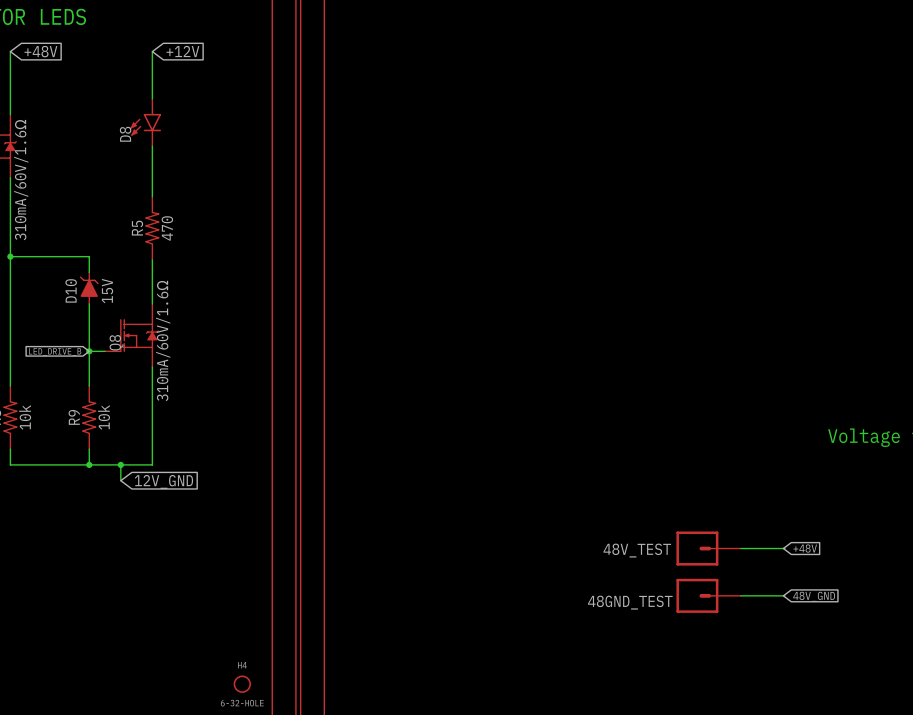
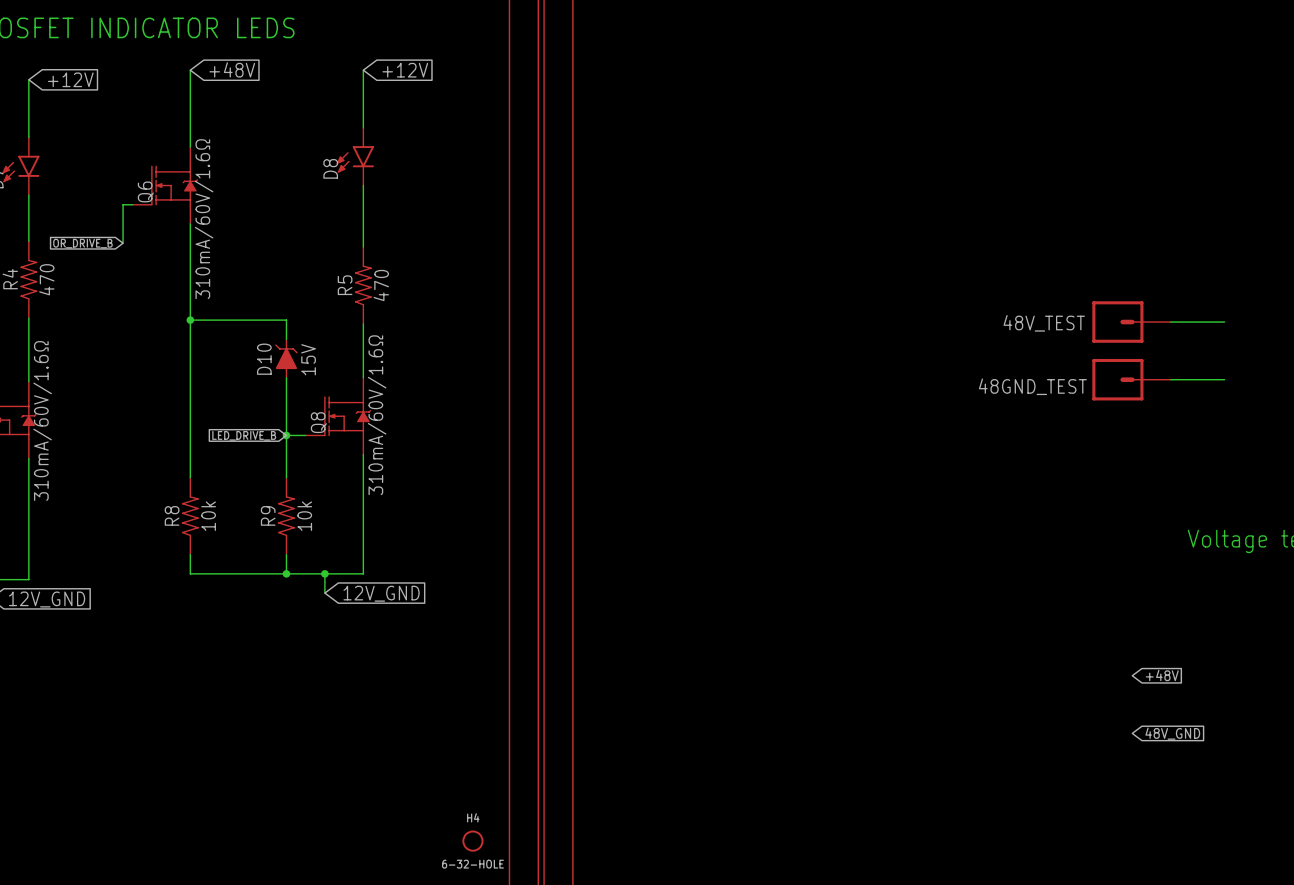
wire: none -> (1170, 322) (1224, 322)
wire: none -> (1170, 379) (1224, 379)
48V_TEST position: (708, 548) -> (1131, 322)
wire: (740, 548) (784, 548) -> none
48GND_TEST position: (708, 595) -> (1131, 379)
wire: (740, 595) (784, 595) -> none

